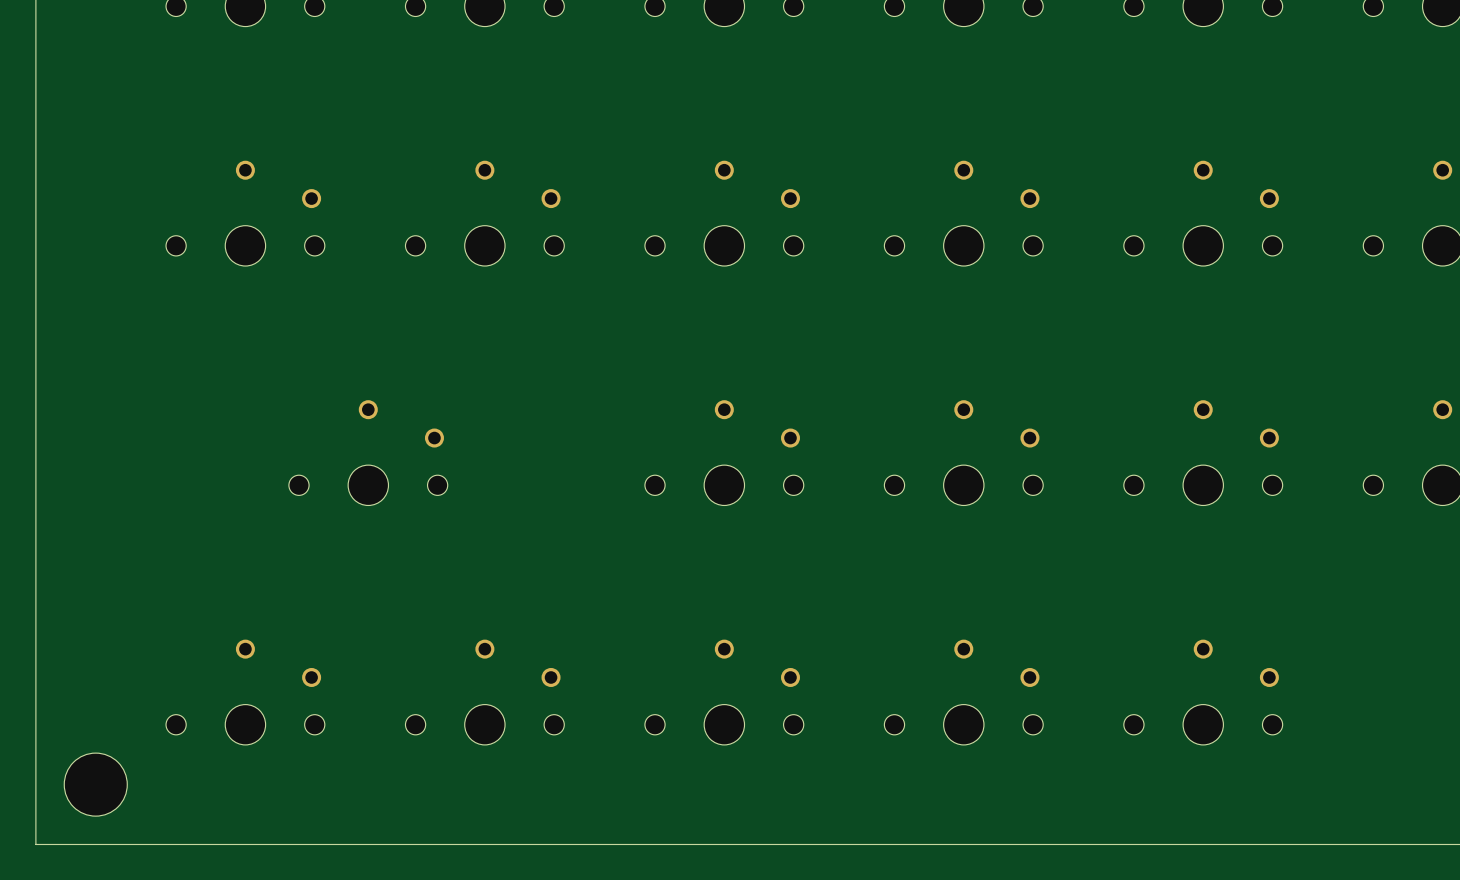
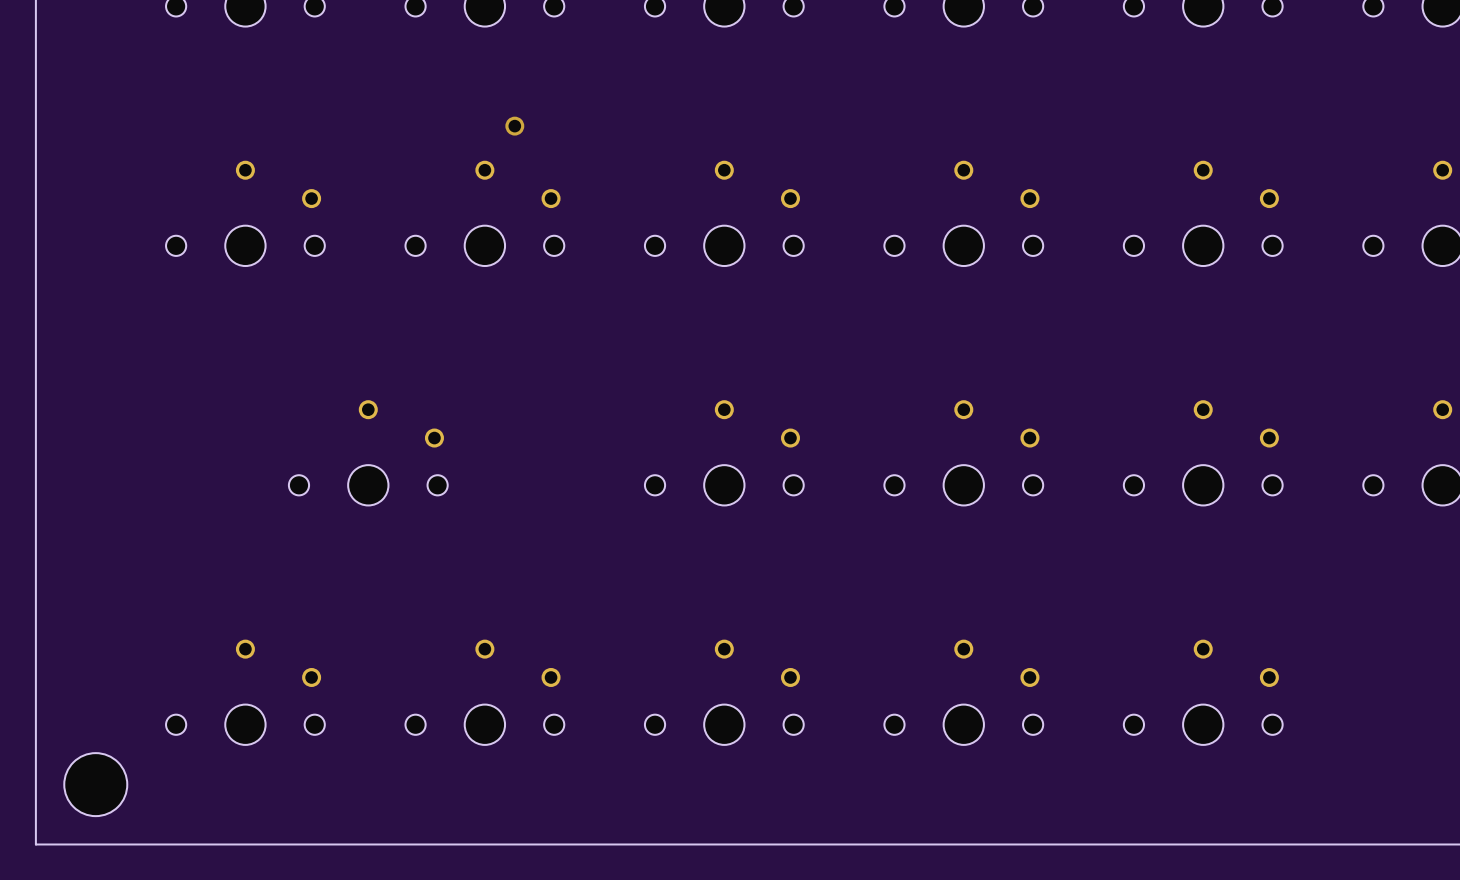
via: none -> (514, 126)

